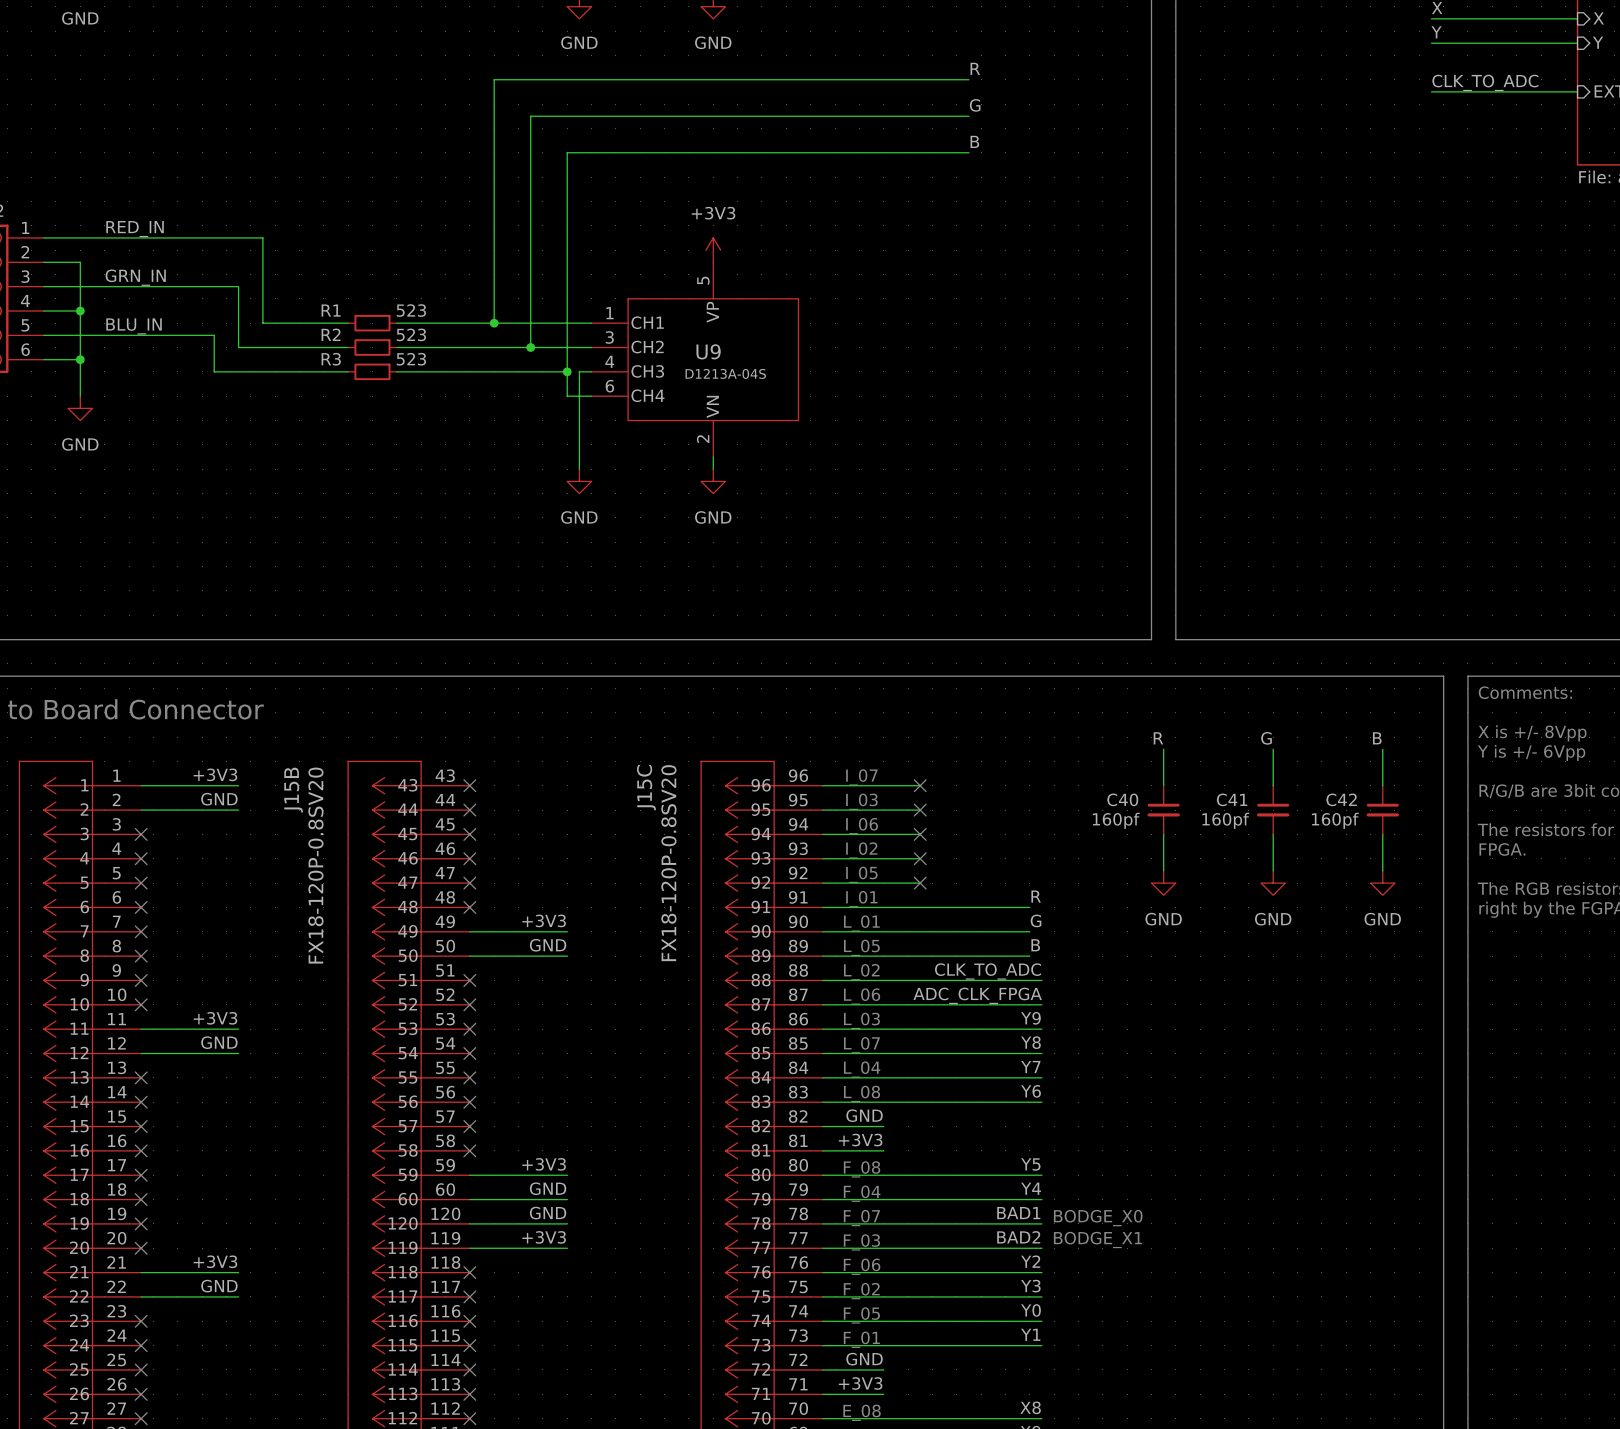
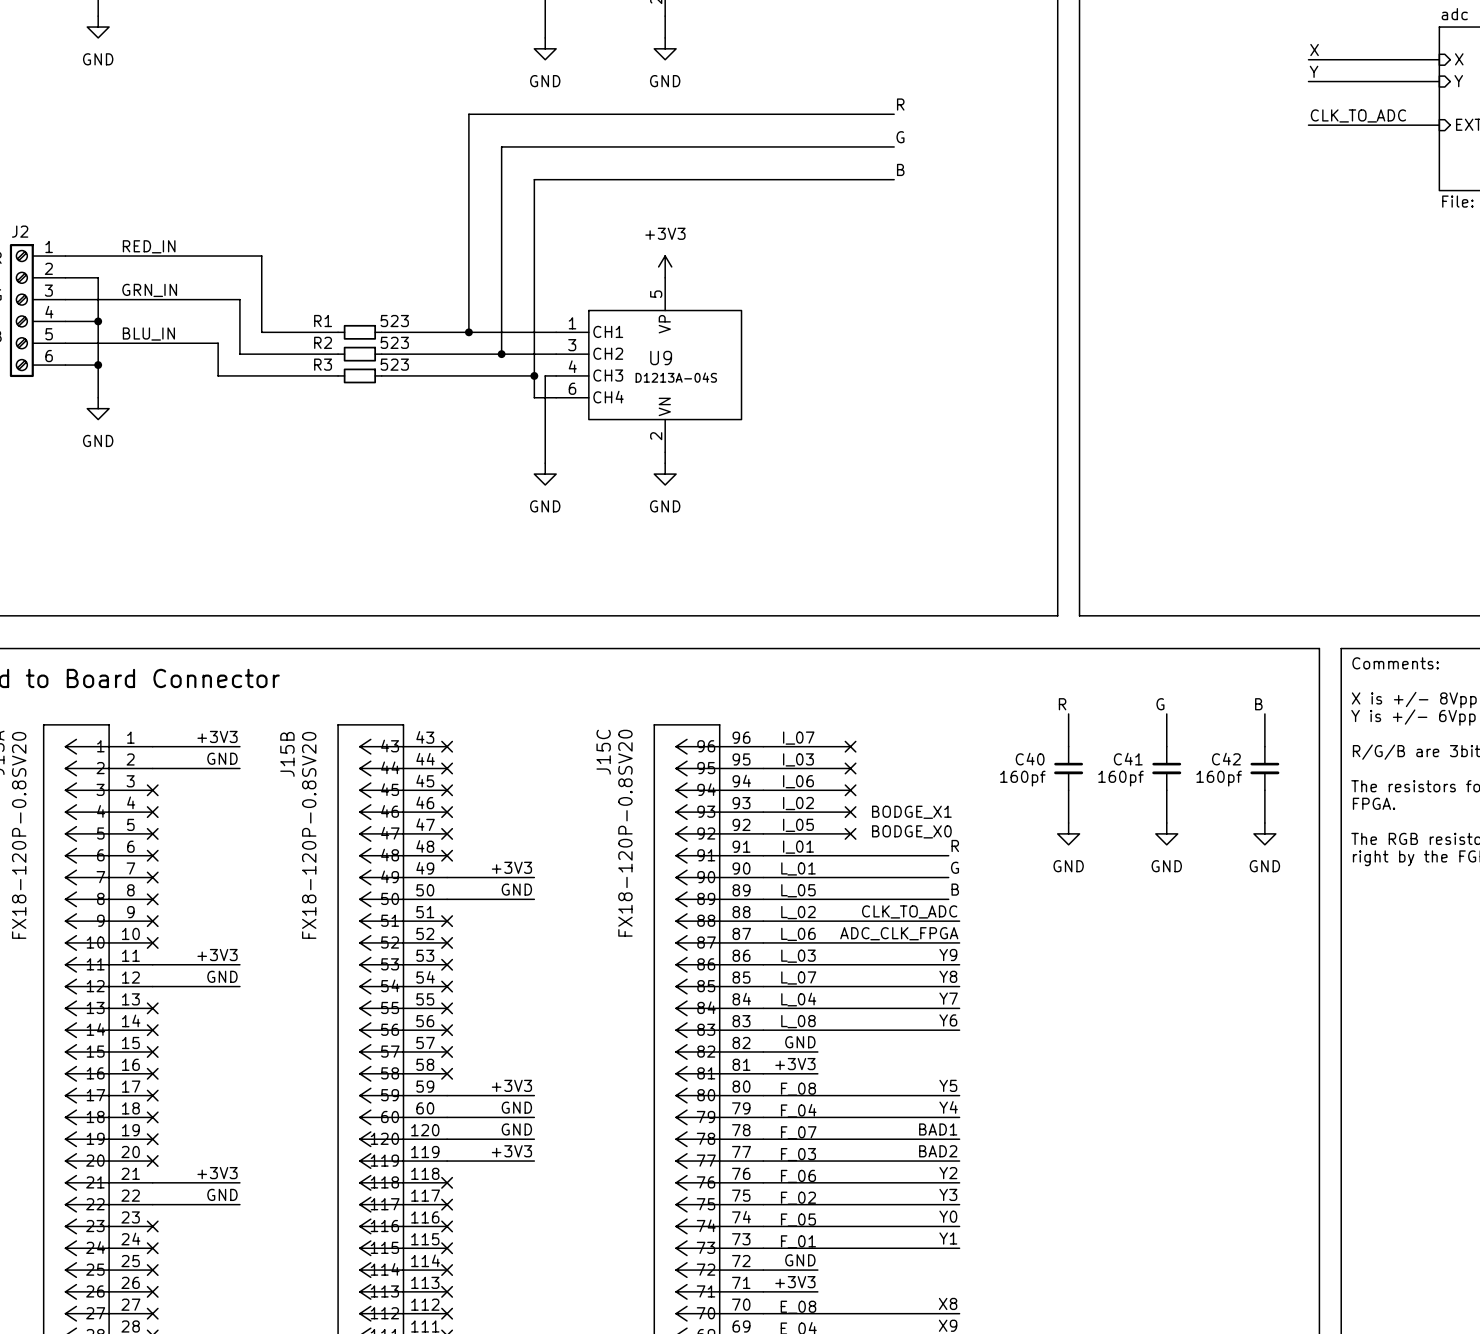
text: none -> BODGE_X1 (911, 812)
text: none -> BODGE_X0 (911, 831)
text: BODGE_X0 (1098, 1218) -> none
text: BODGE_X1 (1097, 1239) -> none

